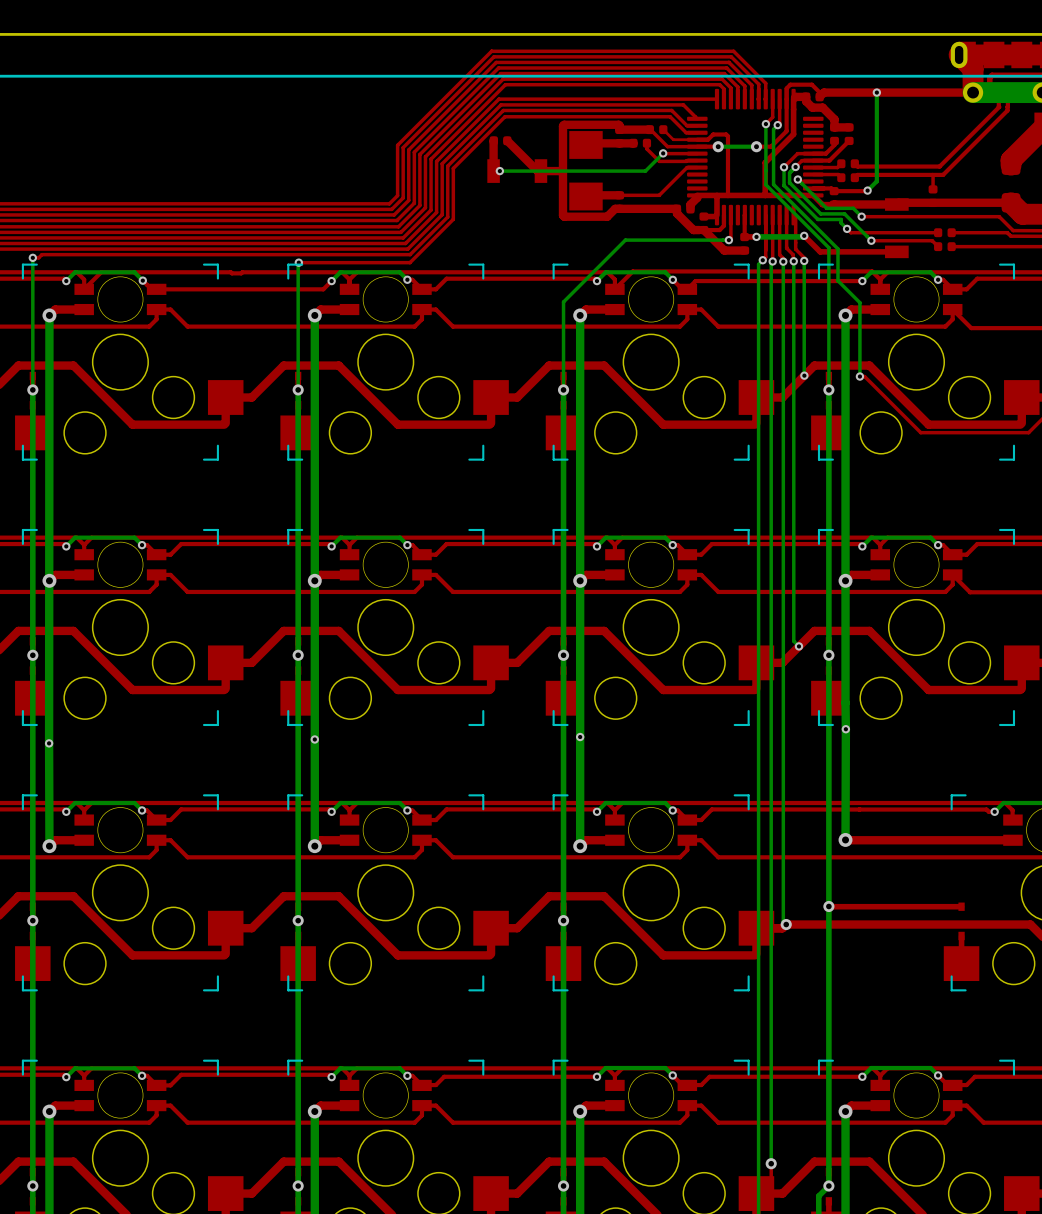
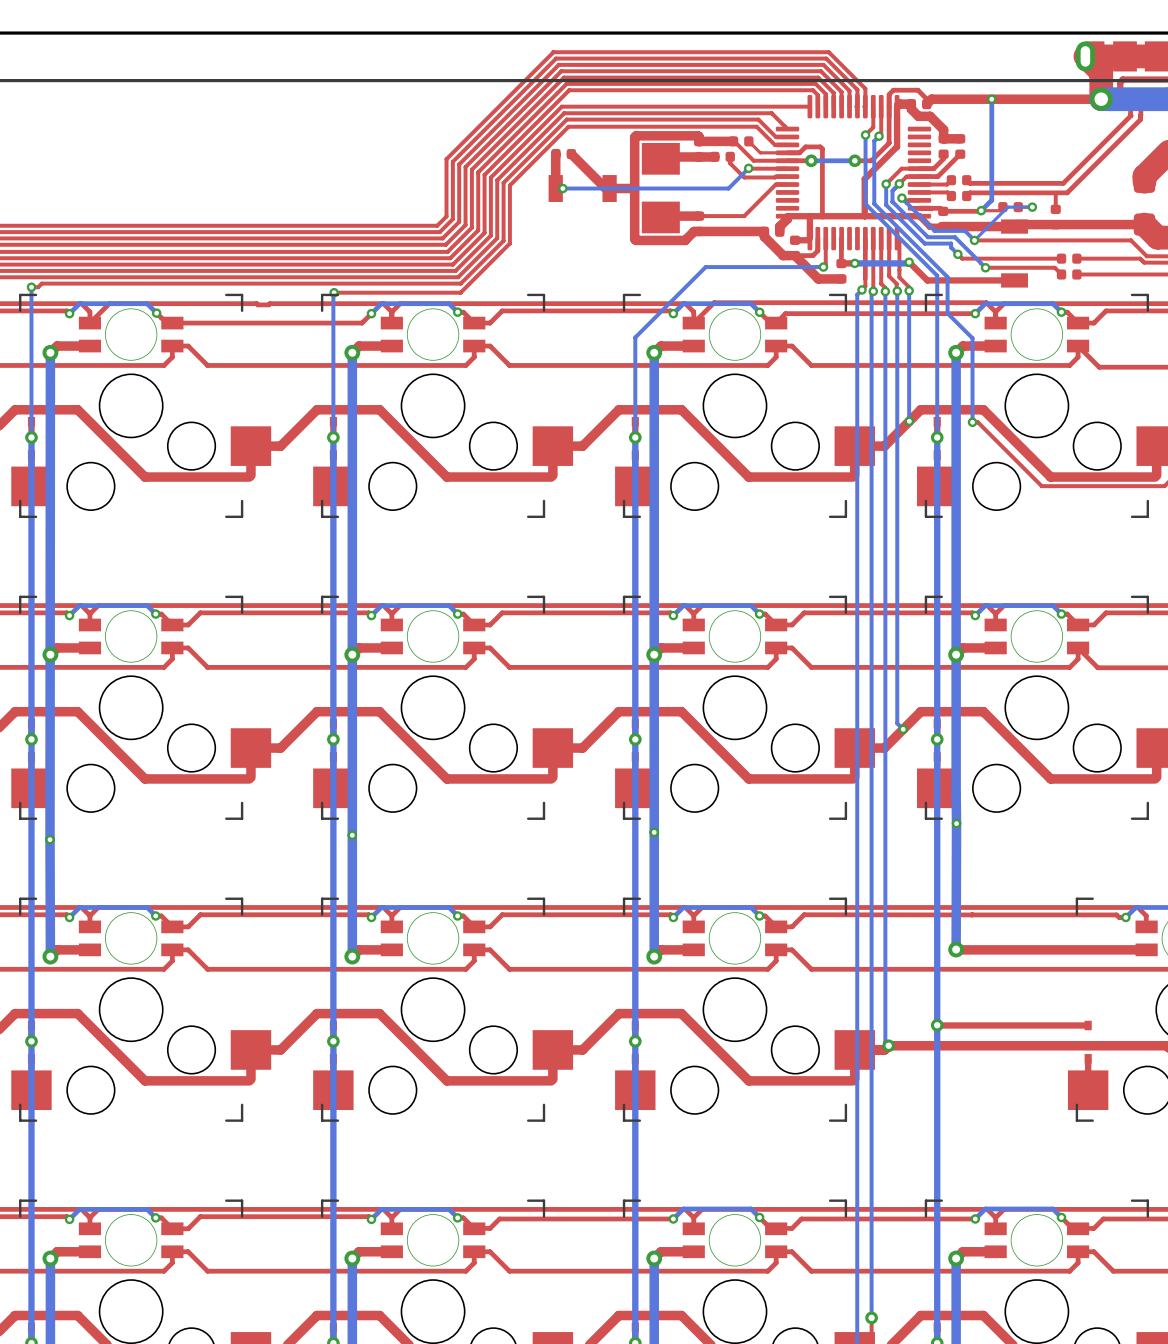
top track: none -> (1002, 207) (999, 210) (981, 210)
part: none -> (1010, 207)
bottom track: none -> (1032, 207) (1007, 207) (974, 240)
via: none -> (1032, 207)

